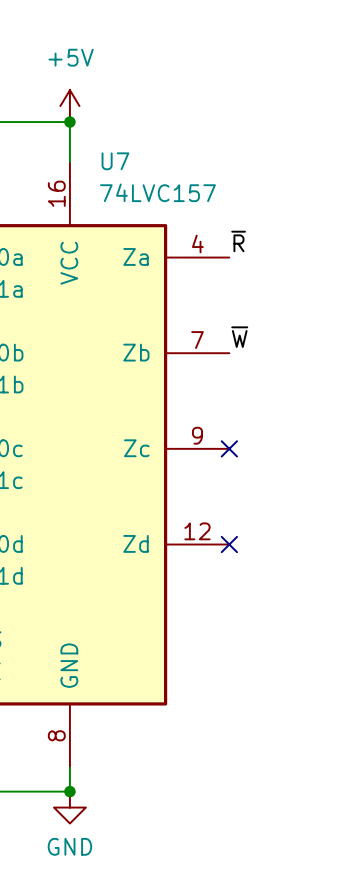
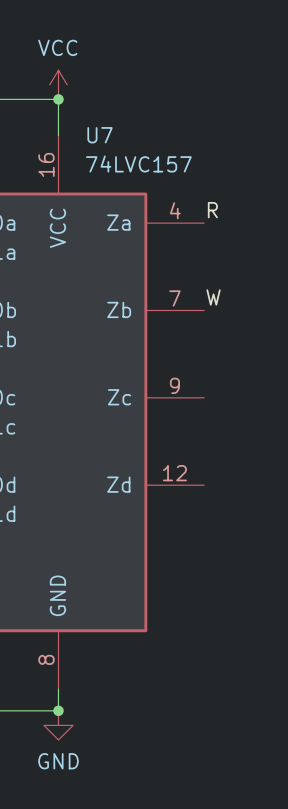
power symbol: +5V (69, 106) -> VCC (58, 84)
label: ~{R} (238, 241) -> R (212, 210)
label: ~{W} (239, 337) -> W (213, 297)
no-connect mark: (229, 448) -> none
no-connect mark: (229, 544) -> none

